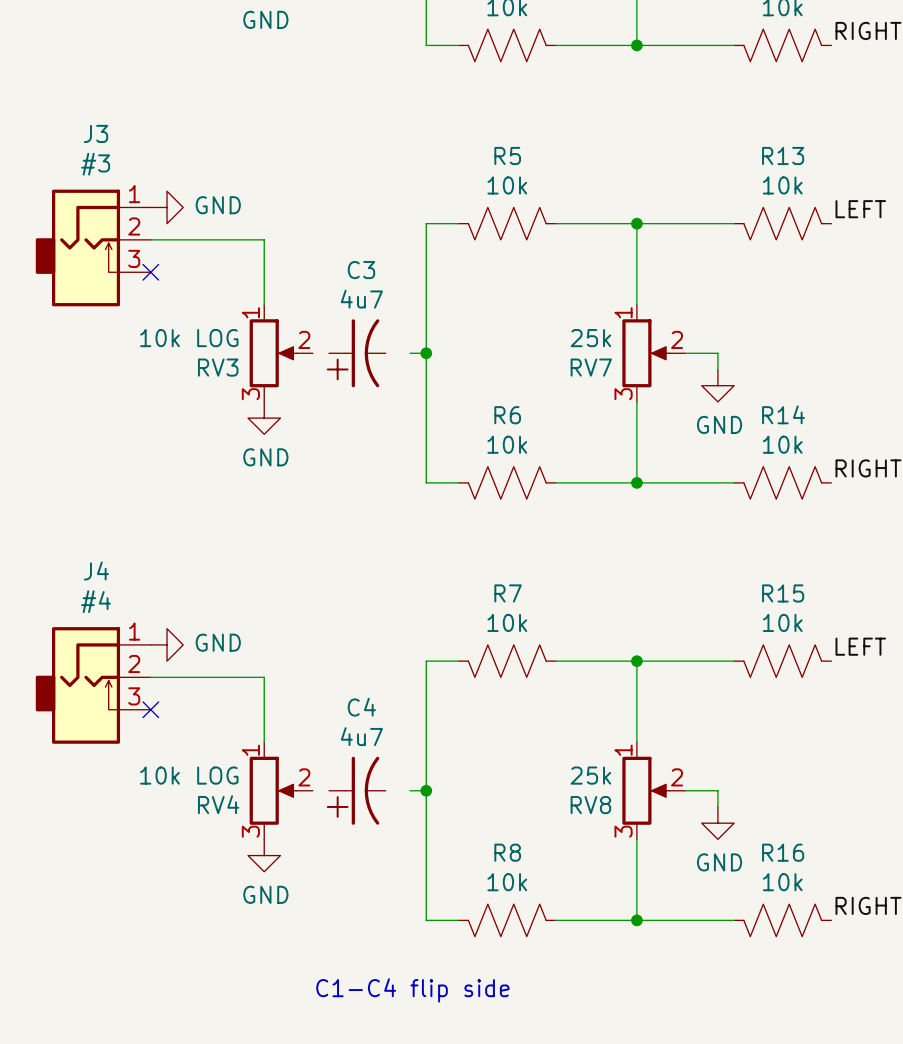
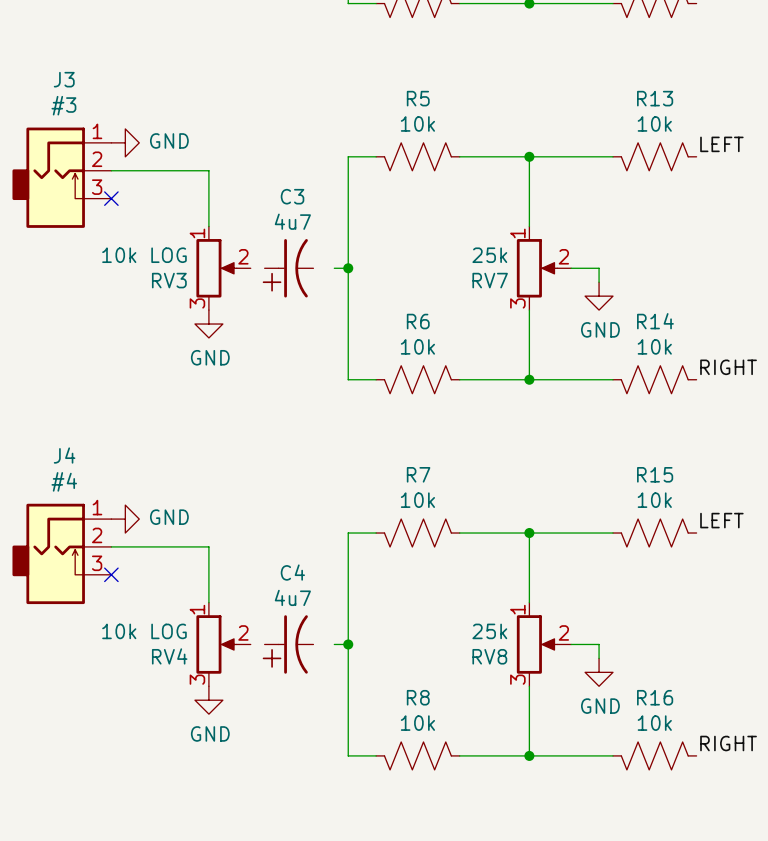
text: C1-C4 flip side (412, 990) -> none

